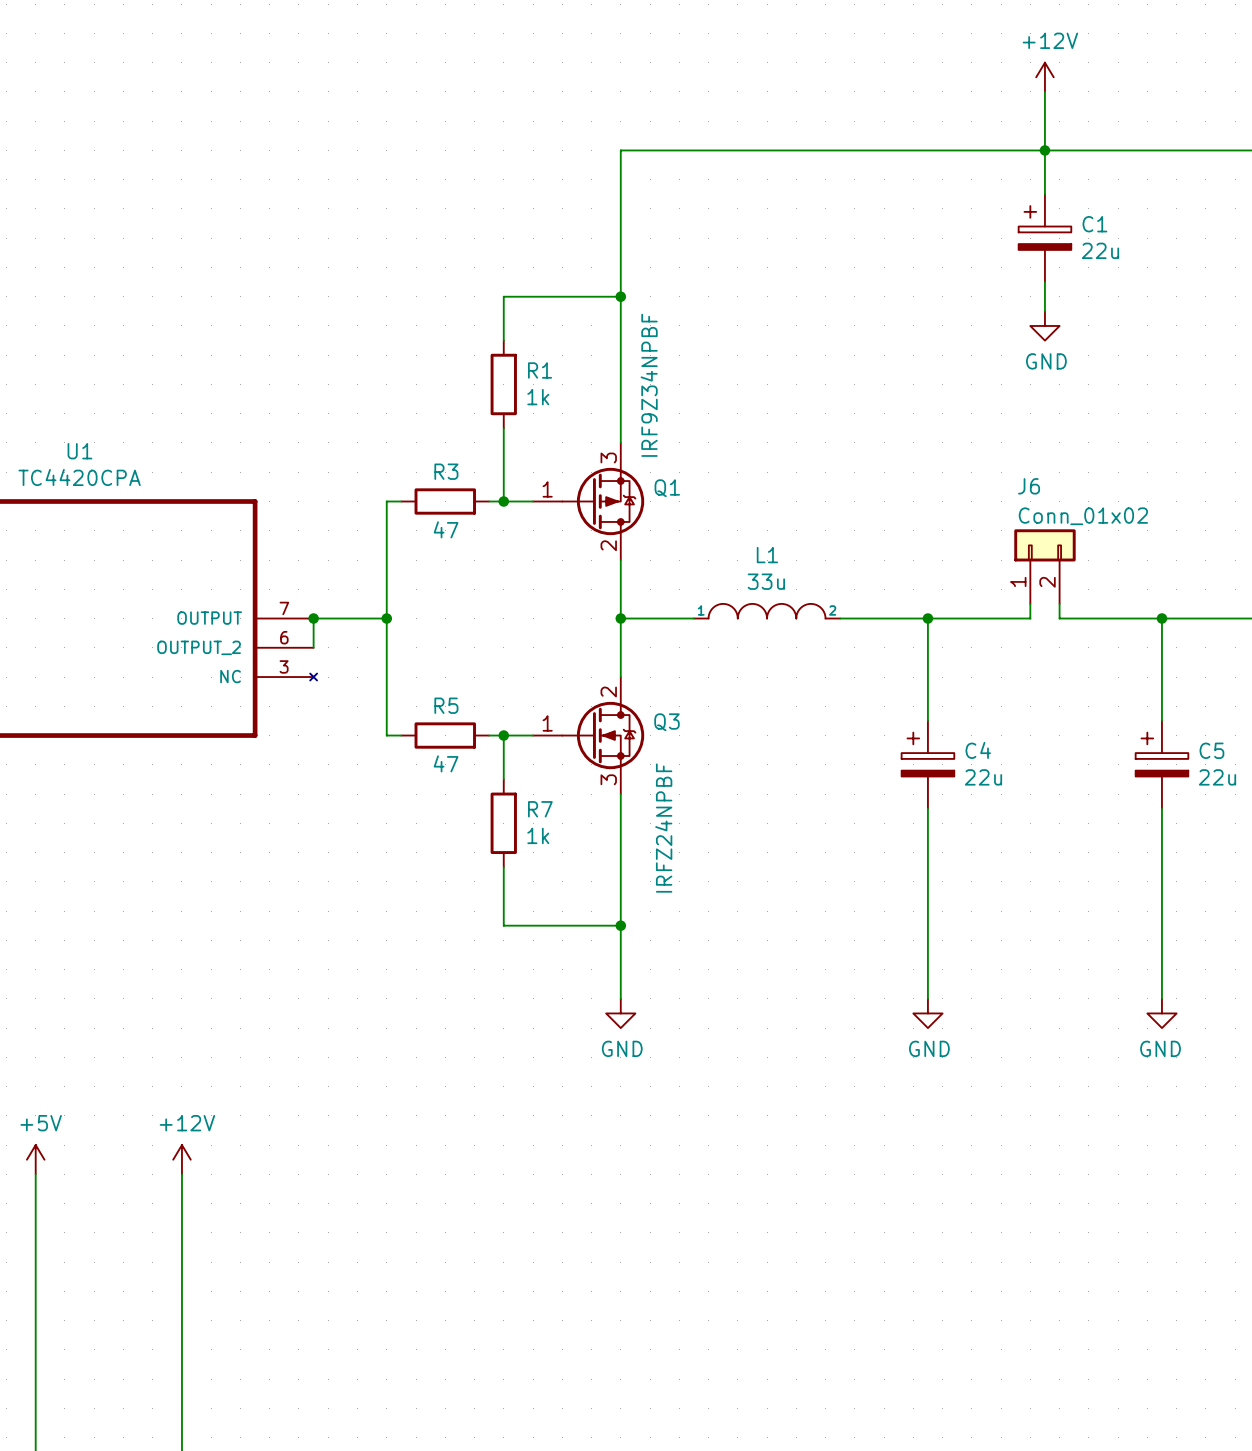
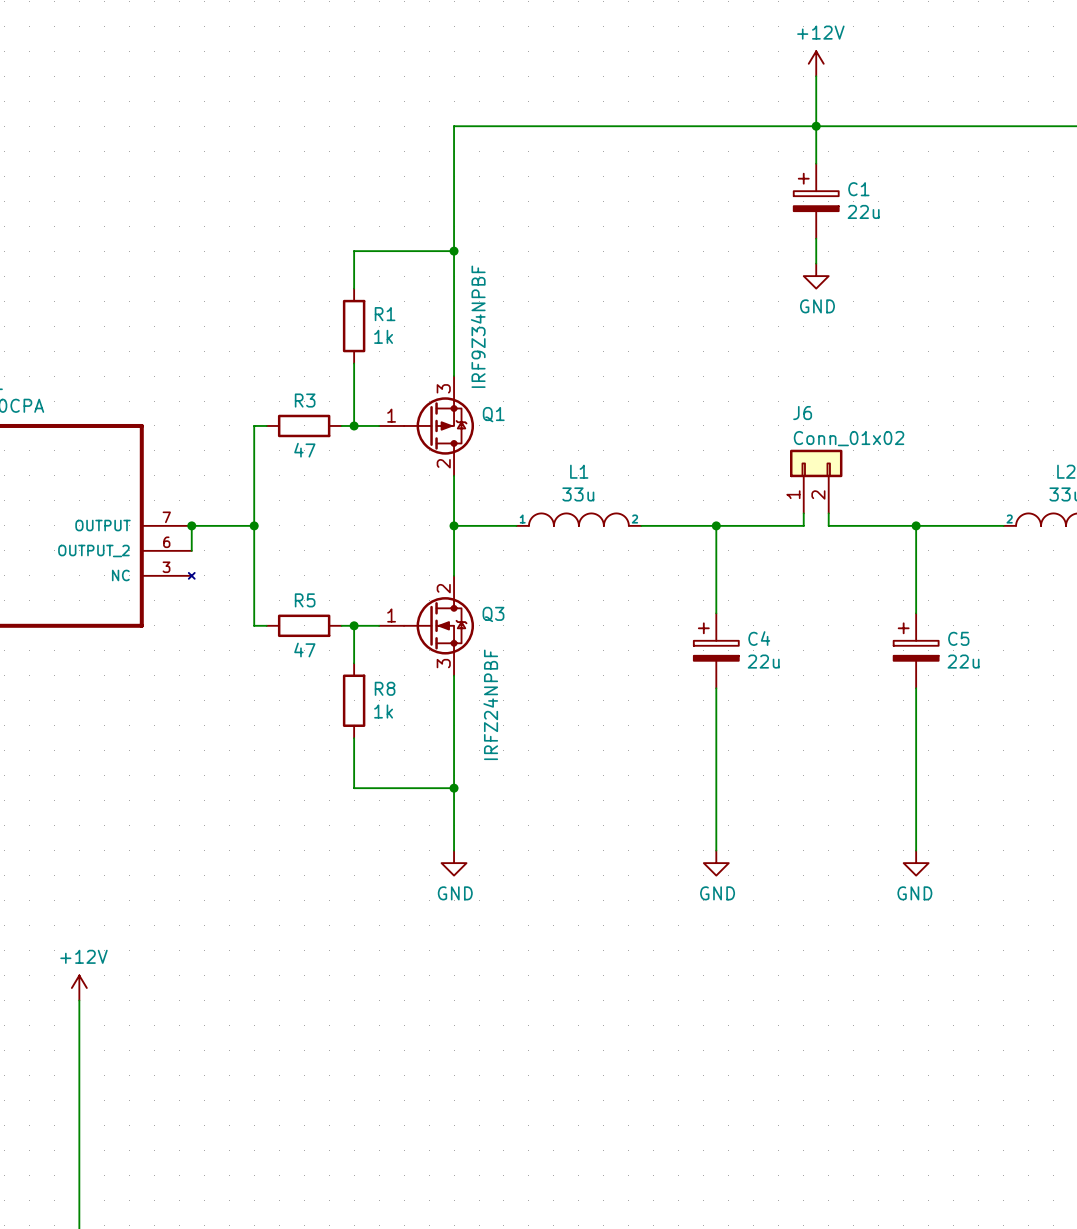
R7 name: R7 (540, 809) -> R8 (385, 688)

